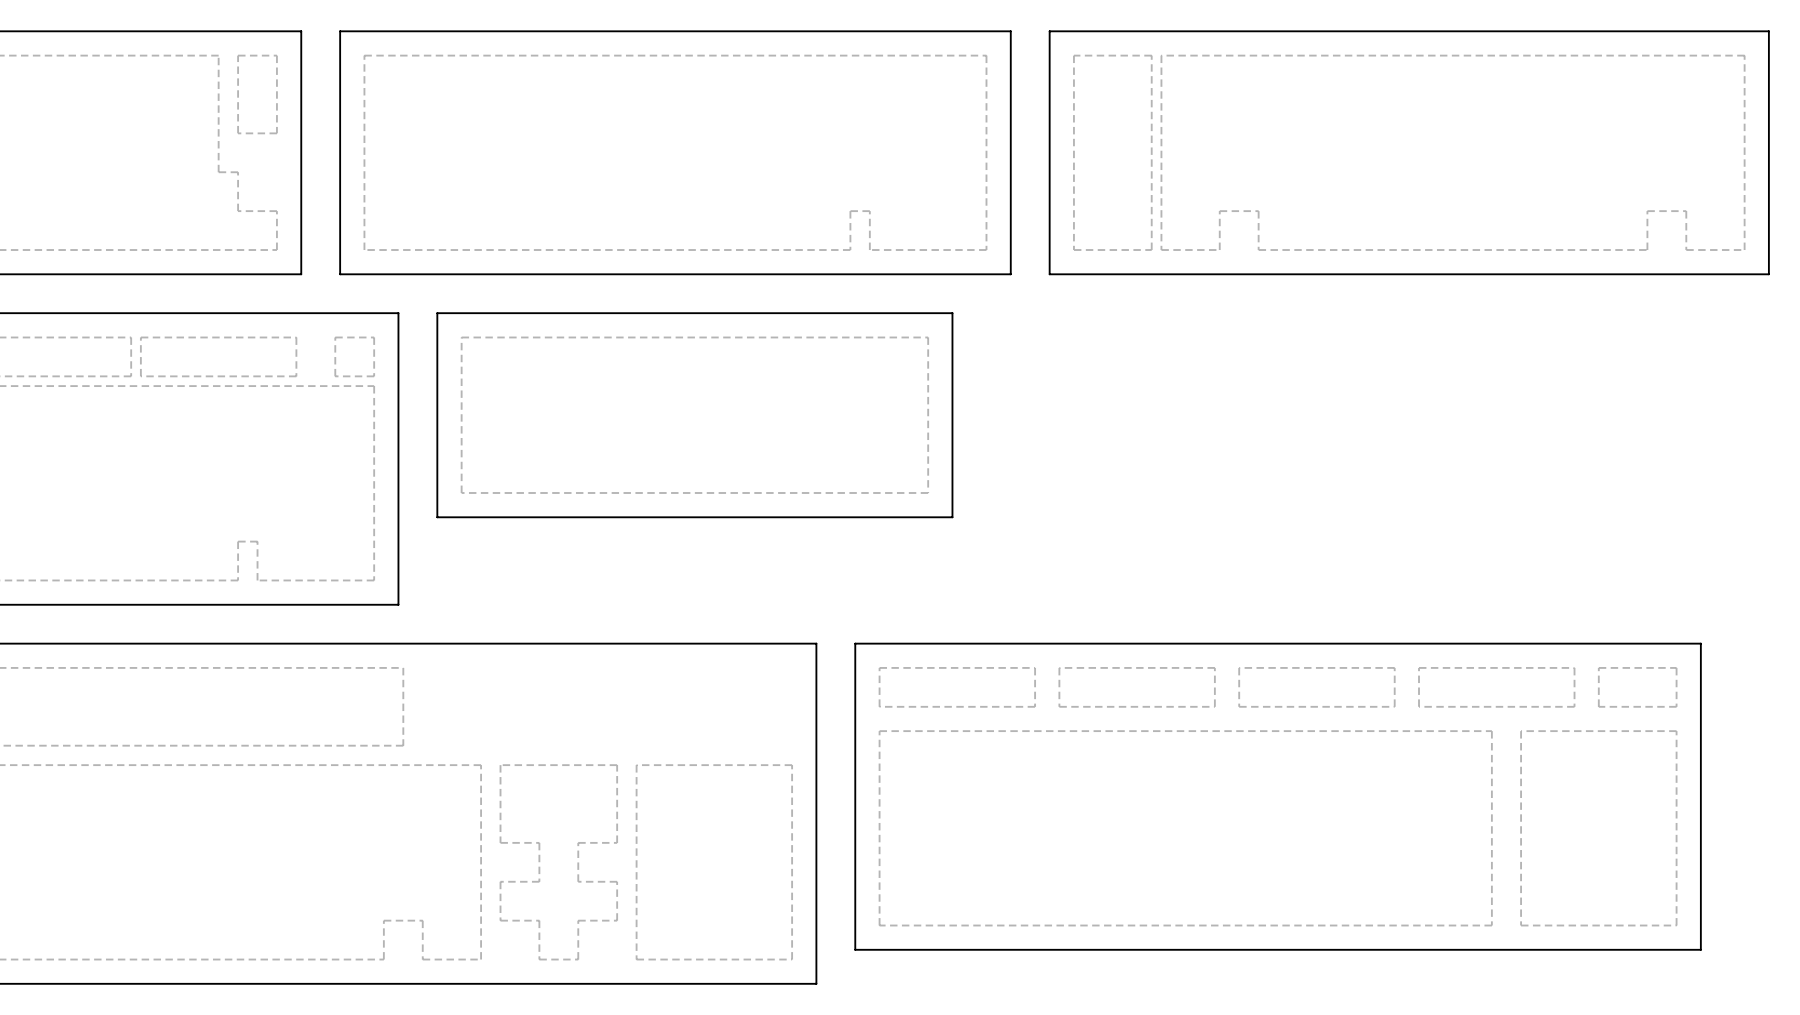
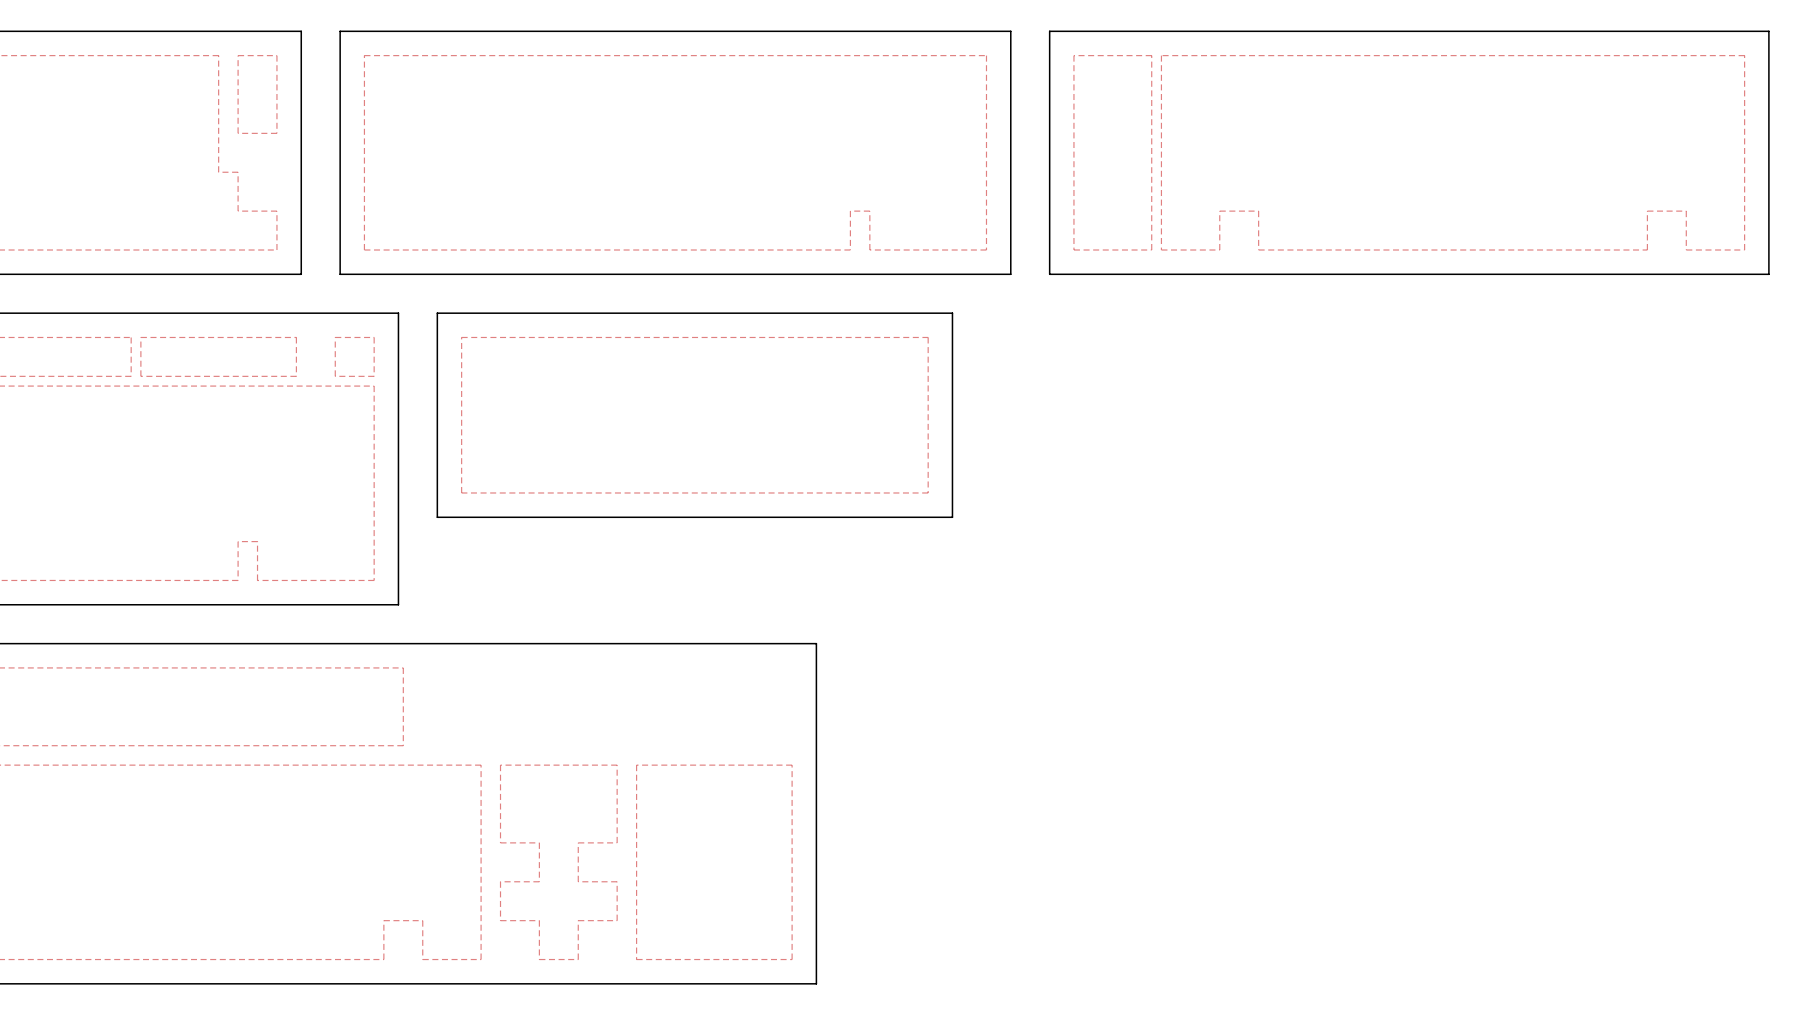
board edge: (855, 643) (855, 949) (1700, 949) (1700, 643) (855, 643) -> none
zone outline: (879, 667) (1035, 667) (1035, 706) (879, 706) (879, 667) -> none
zone outline: (1059, 667) (1214, 667) (1214, 706) (1059, 706) (1059, 667) -> none
zone outline: (1239, 667) (1394, 667) (1394, 706) (1239, 706) (1239, 667) -> none
zone outline: (1419, 667) (1574, 667) (1574, 706) (1419, 706) (1419, 667) -> none
zone outline: (1598, 667) (1676, 667) (1676, 706) (1598, 706) (1598, 667) -> none
zone outline: (879, 731) (879, 925) (1491, 925) (1491, 731) (879, 731) -> none
zone outline: (1521, 731) (1521, 925) (1676, 925) (1676, 731) (1521, 731) -> none

